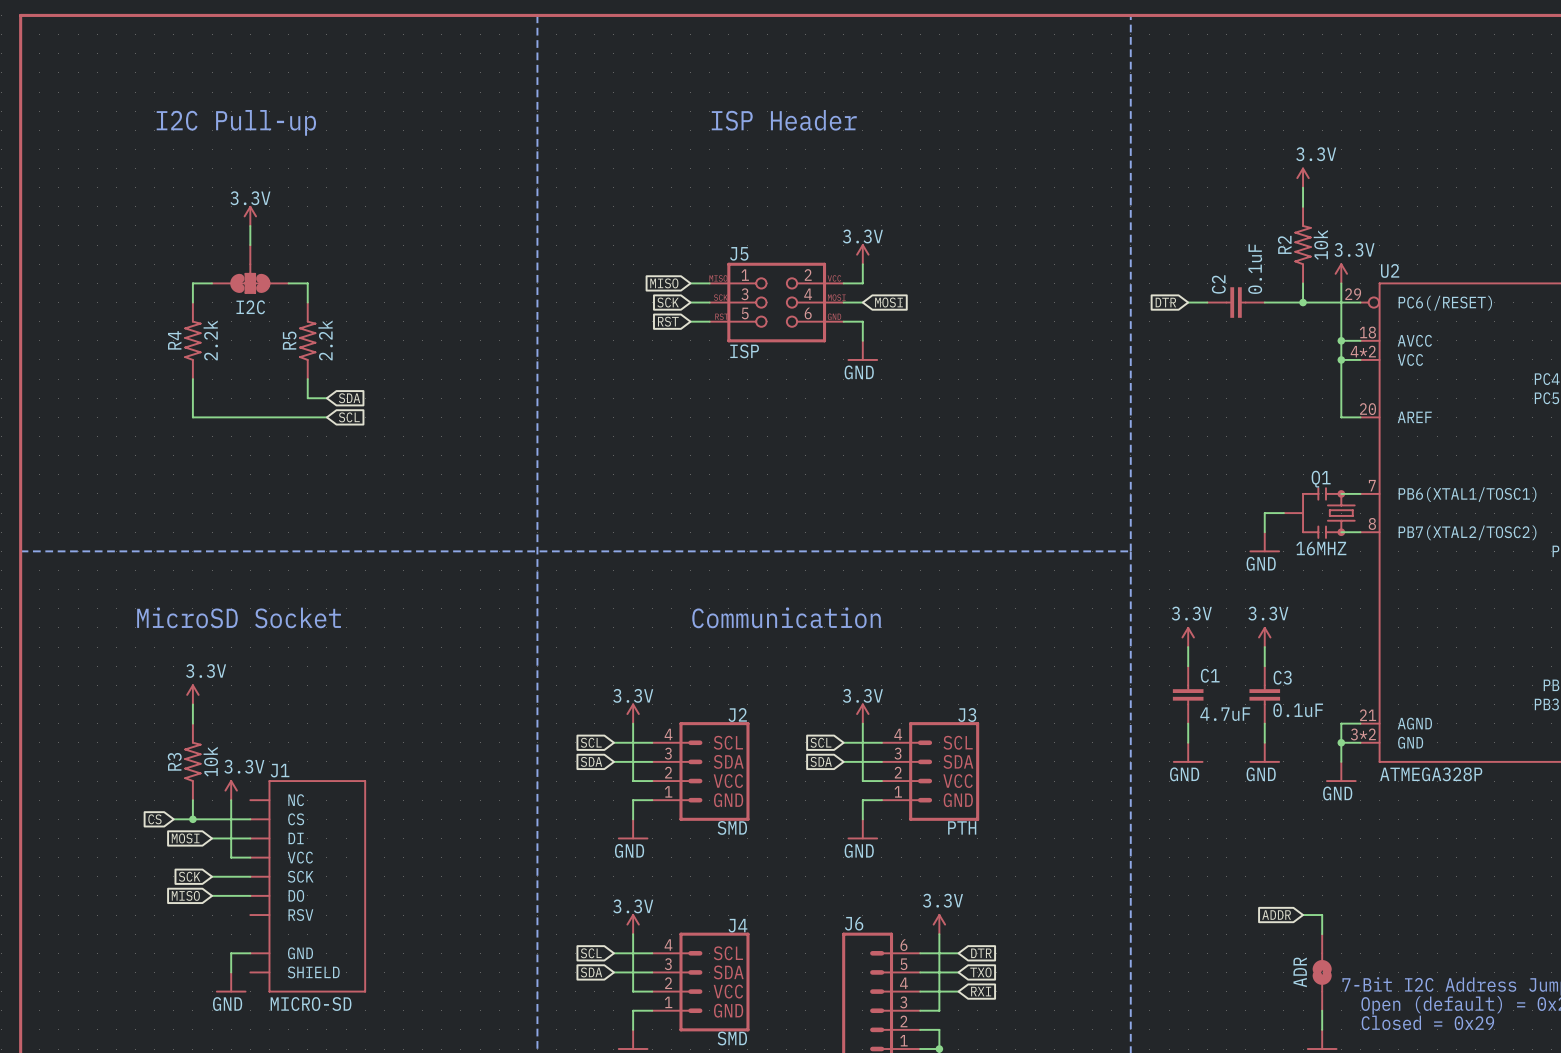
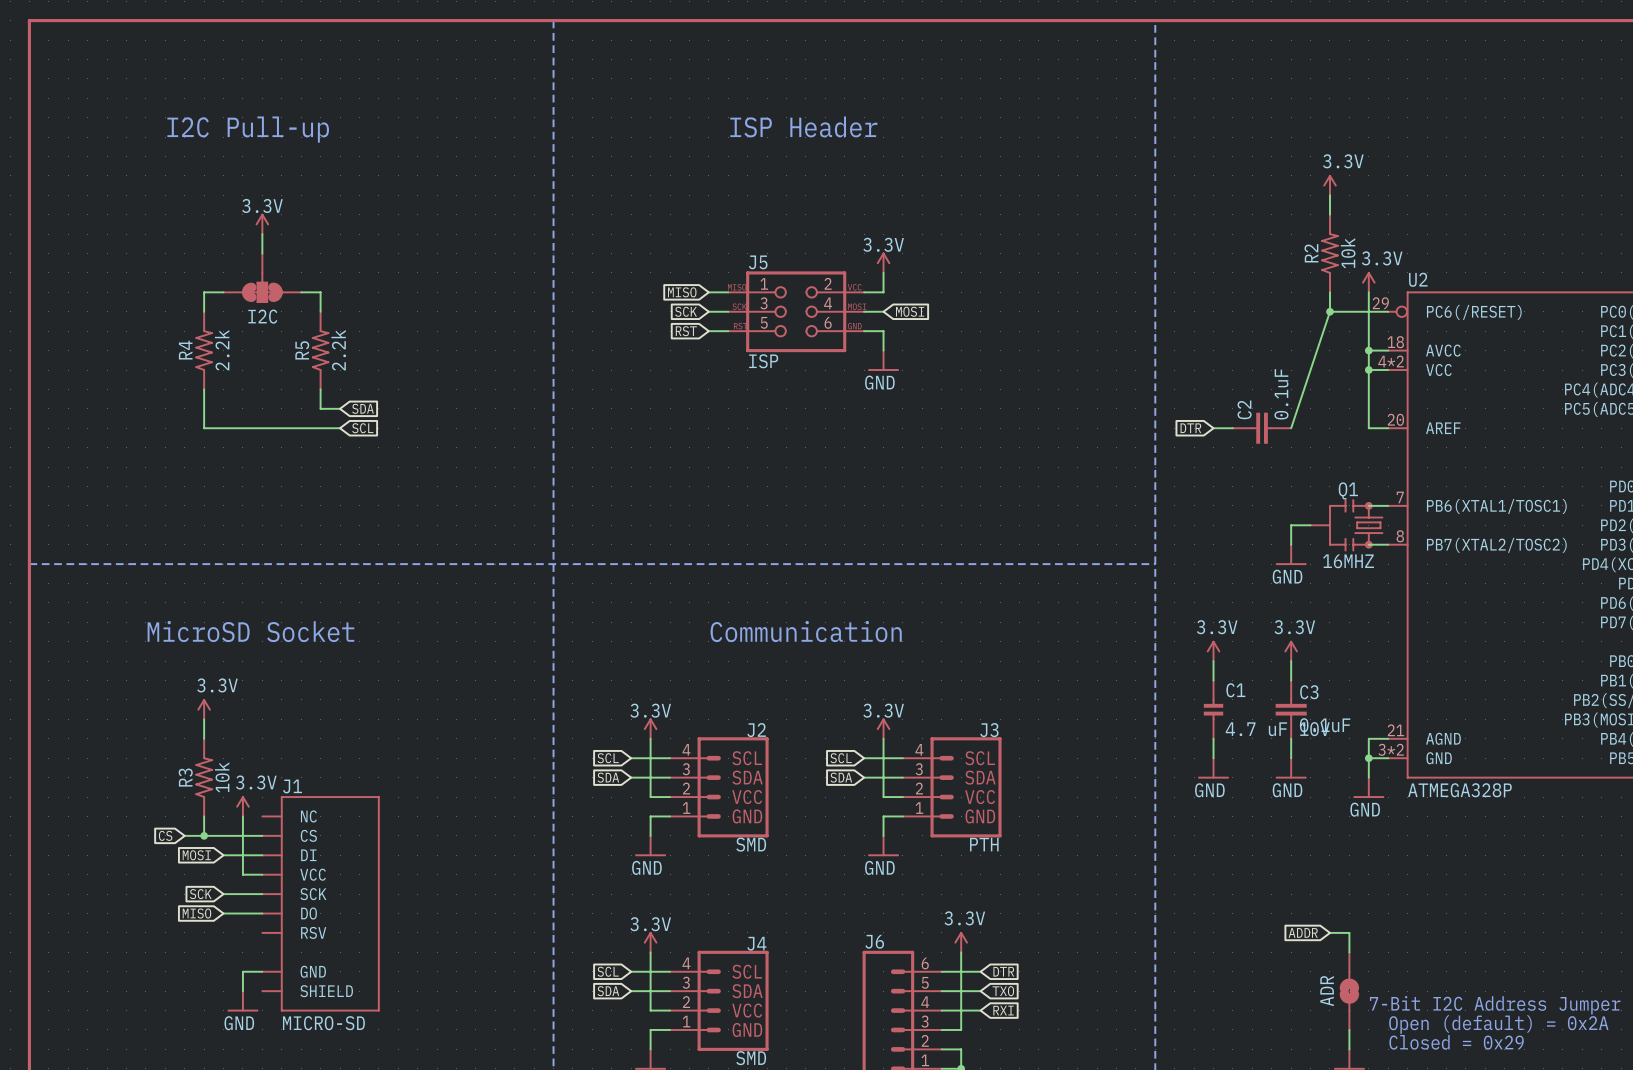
global label position: DTR (1165, 302) -> DTR (1190, 428)
wire: (1188, 302) (1207, 302) -> (1213, 428) (1232, 428)
C2 position: (1236, 302) -> (1262, 428)
wire: (1264, 302) (1303, 302) -> (1291, 428) (1329, 311)
C1 symbol: [1172, 666, 1204, 724] -> [1203, 680, 1224, 739]
C1 value: 4.7uF (1225, 714) -> 4.7 uF 10V (1277, 729)

